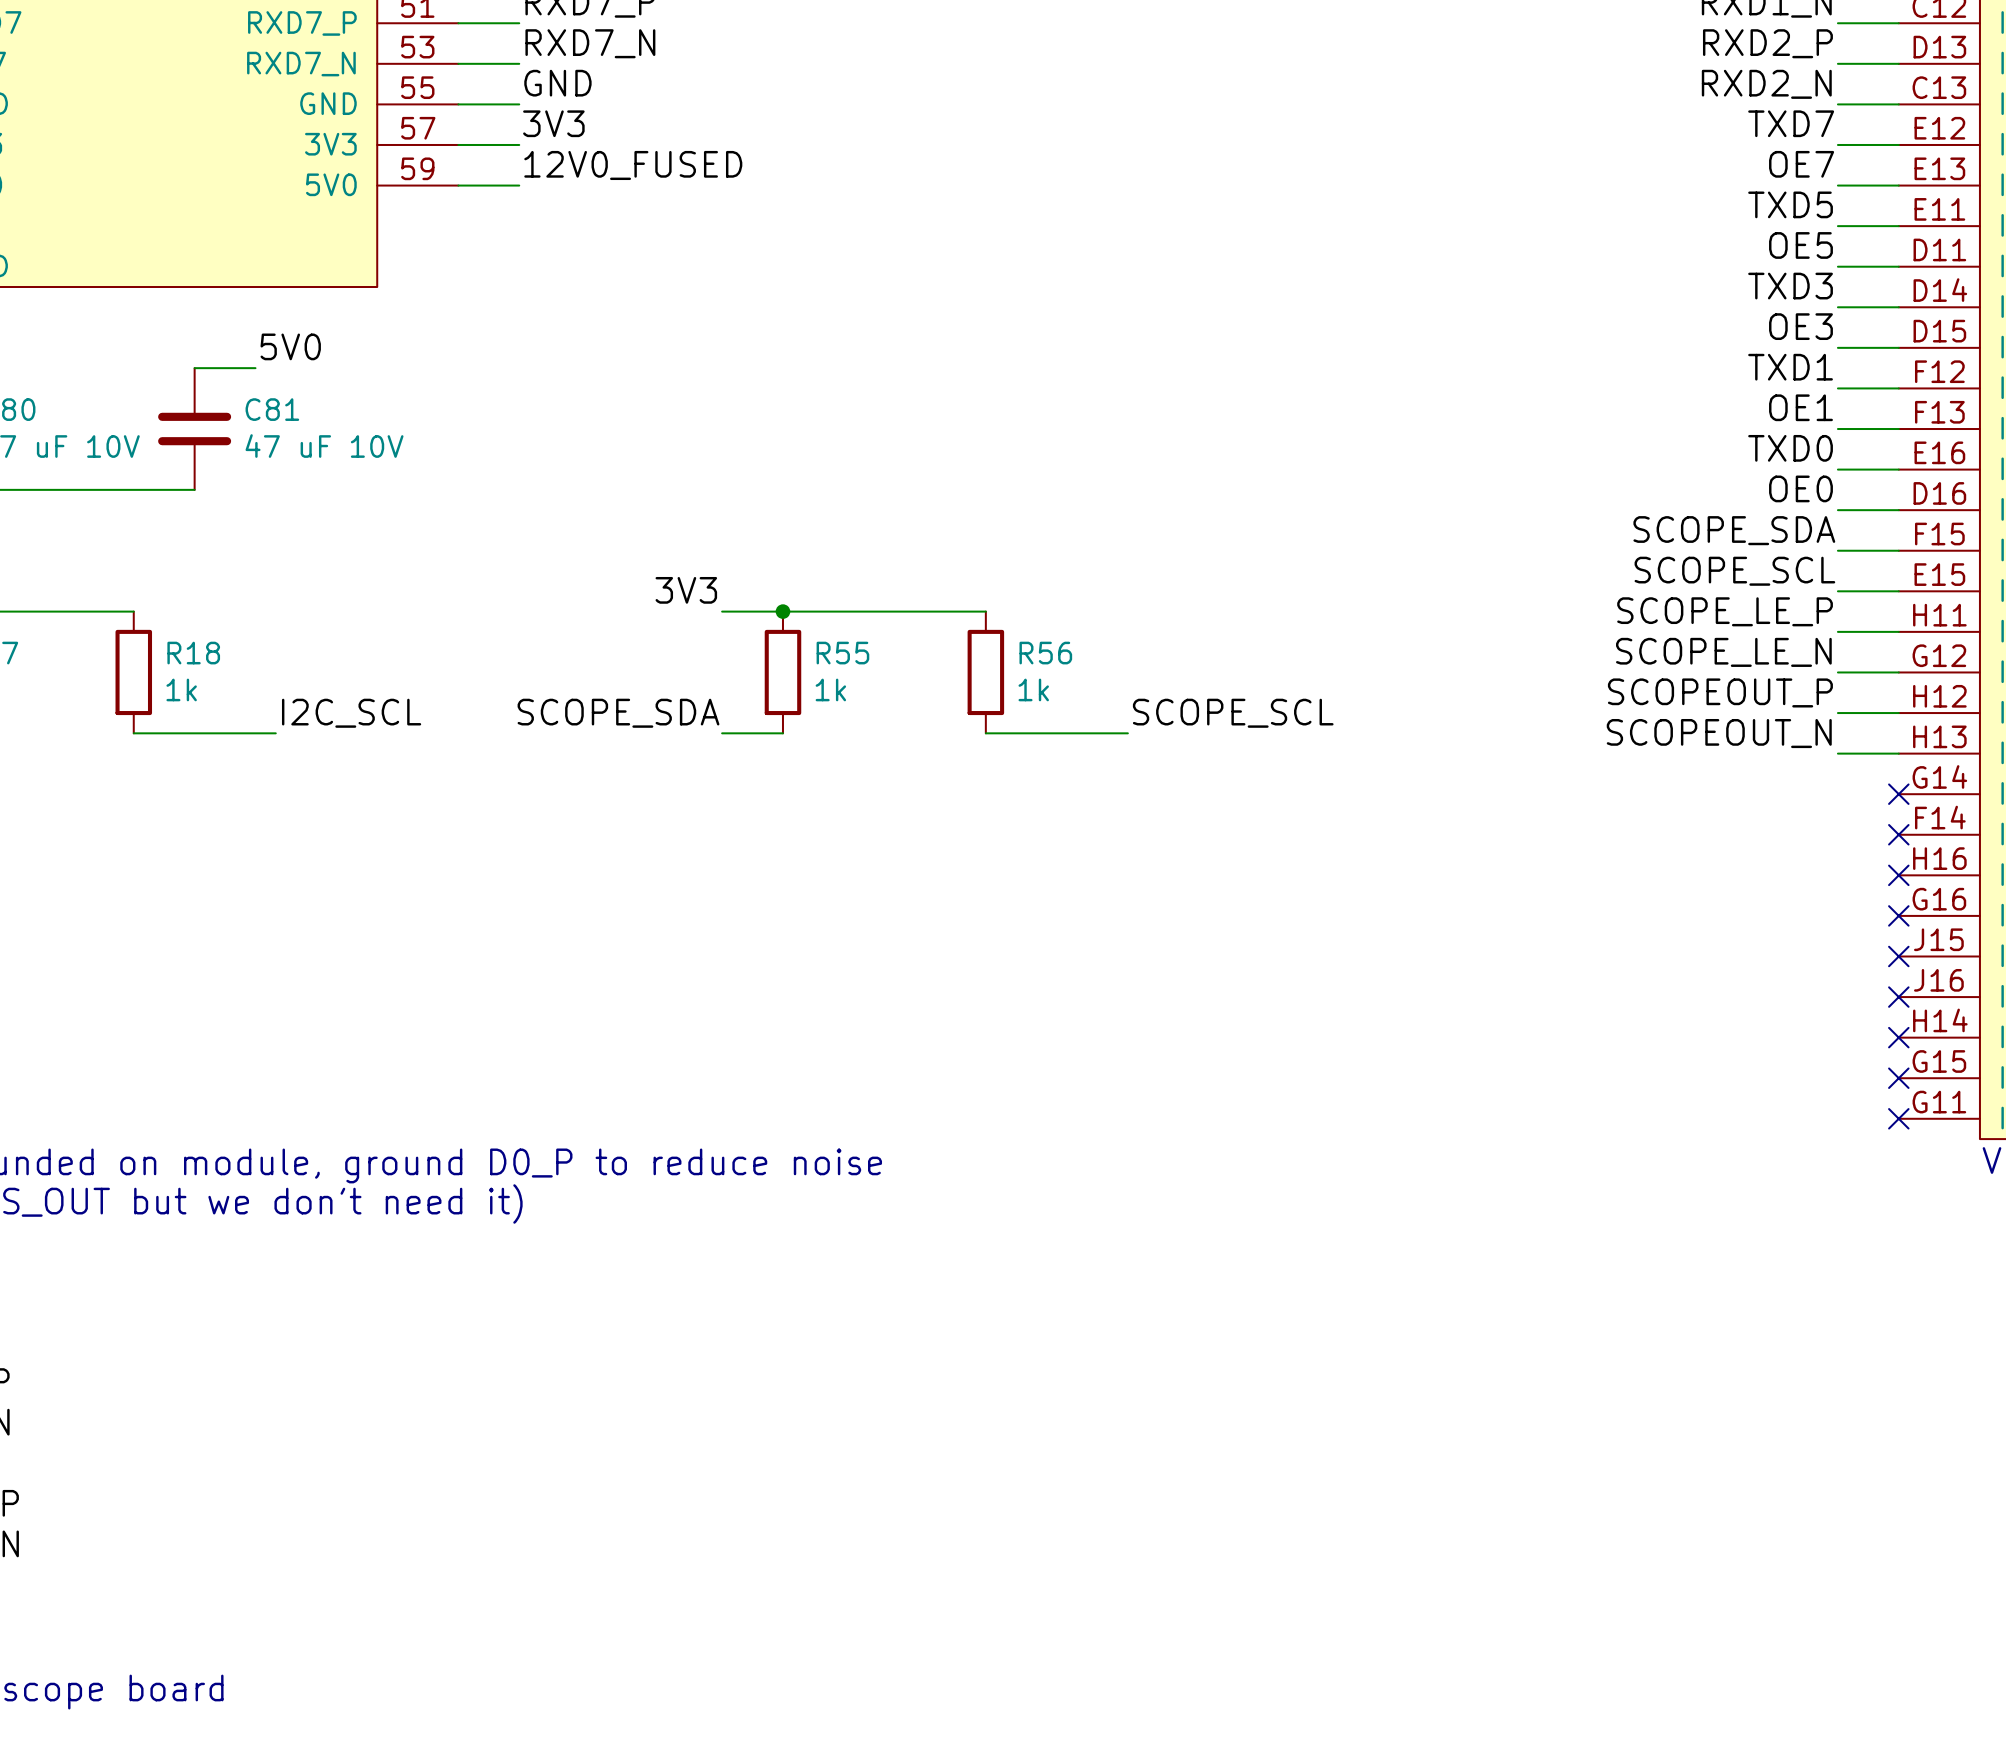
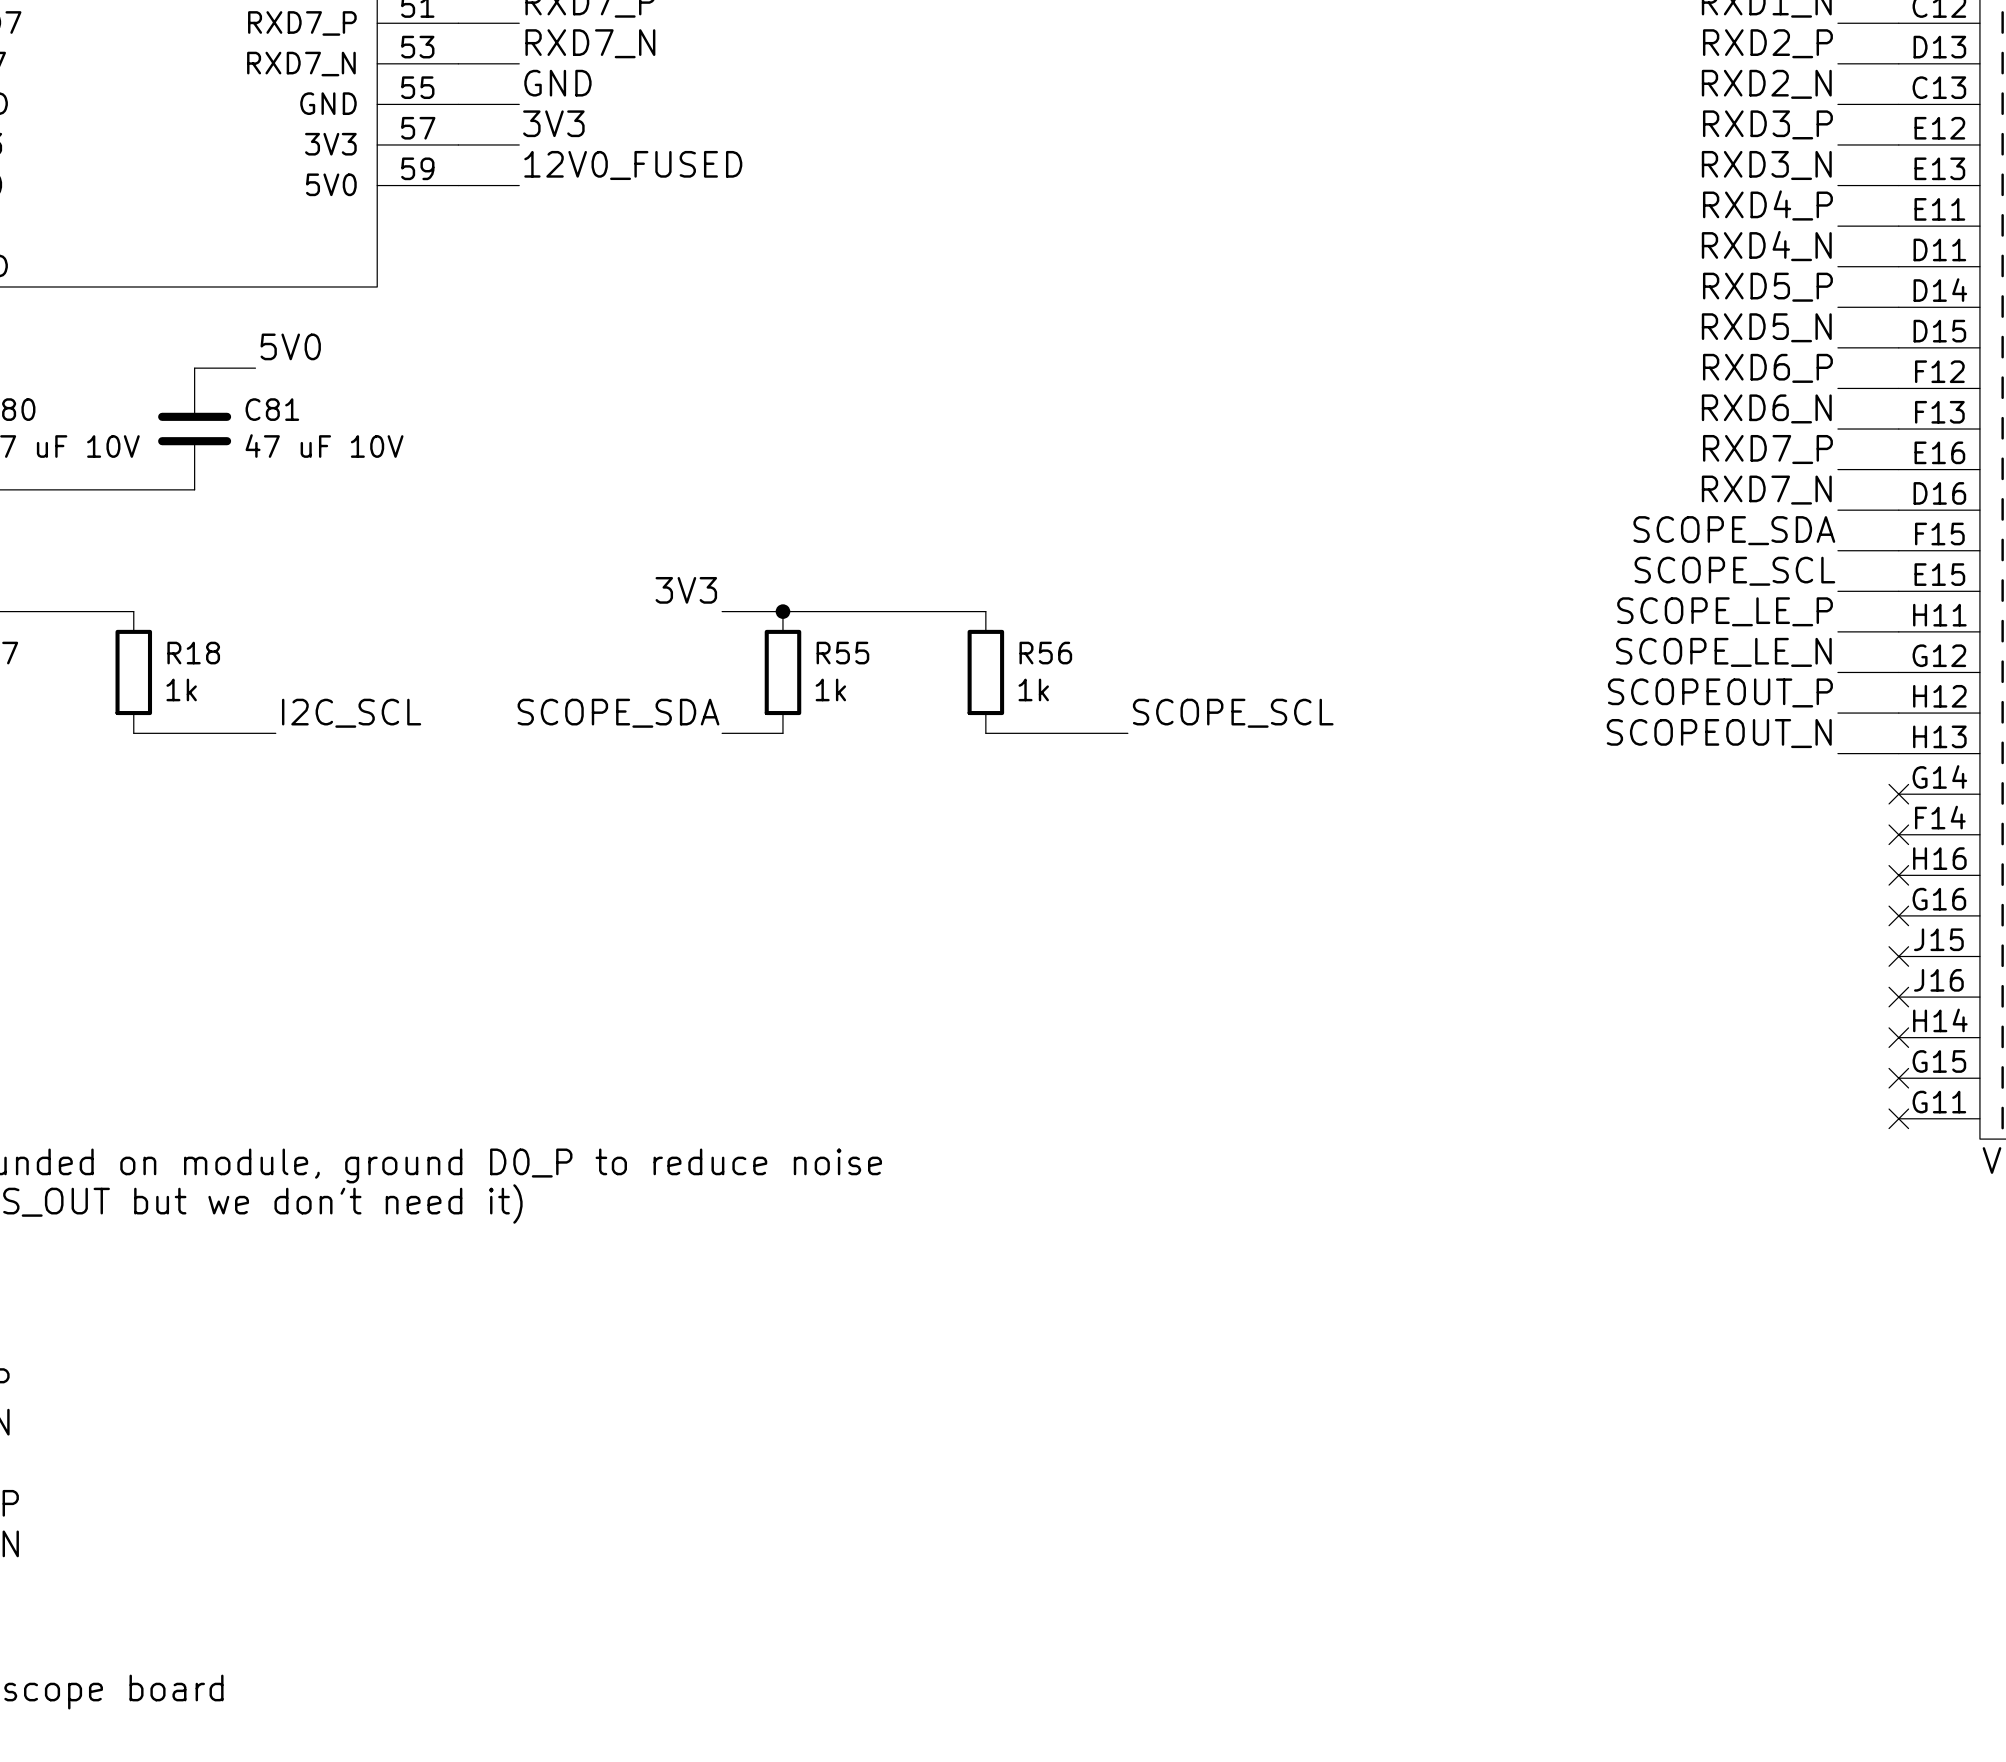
label: TXD7 (1791, 123) -> RXD3_P (1767, 124)
label: OE7 (1801, 164) -> RXD3_N (1766, 165)
label: TXD5 (1790, 204) -> RXD4_P (1767, 205)
label: OE5 (1800, 245) -> RXD4_N (1766, 246)
label: TXD3 (1790, 286) -> RXD5_P (1767, 287)
label: OE3 (1800, 326) -> RXD5_N (1766, 327)
label: TXD1 (1790, 367) -> RXD6_P (1767, 368)
label: OE1 (1800, 407) -> RXD6_N (1766, 408)
label: TXD0 (1790, 448) -> RXD7_P (1767, 449)
label: OE0 (1800, 488) -> RXD7_N (1766, 490)

